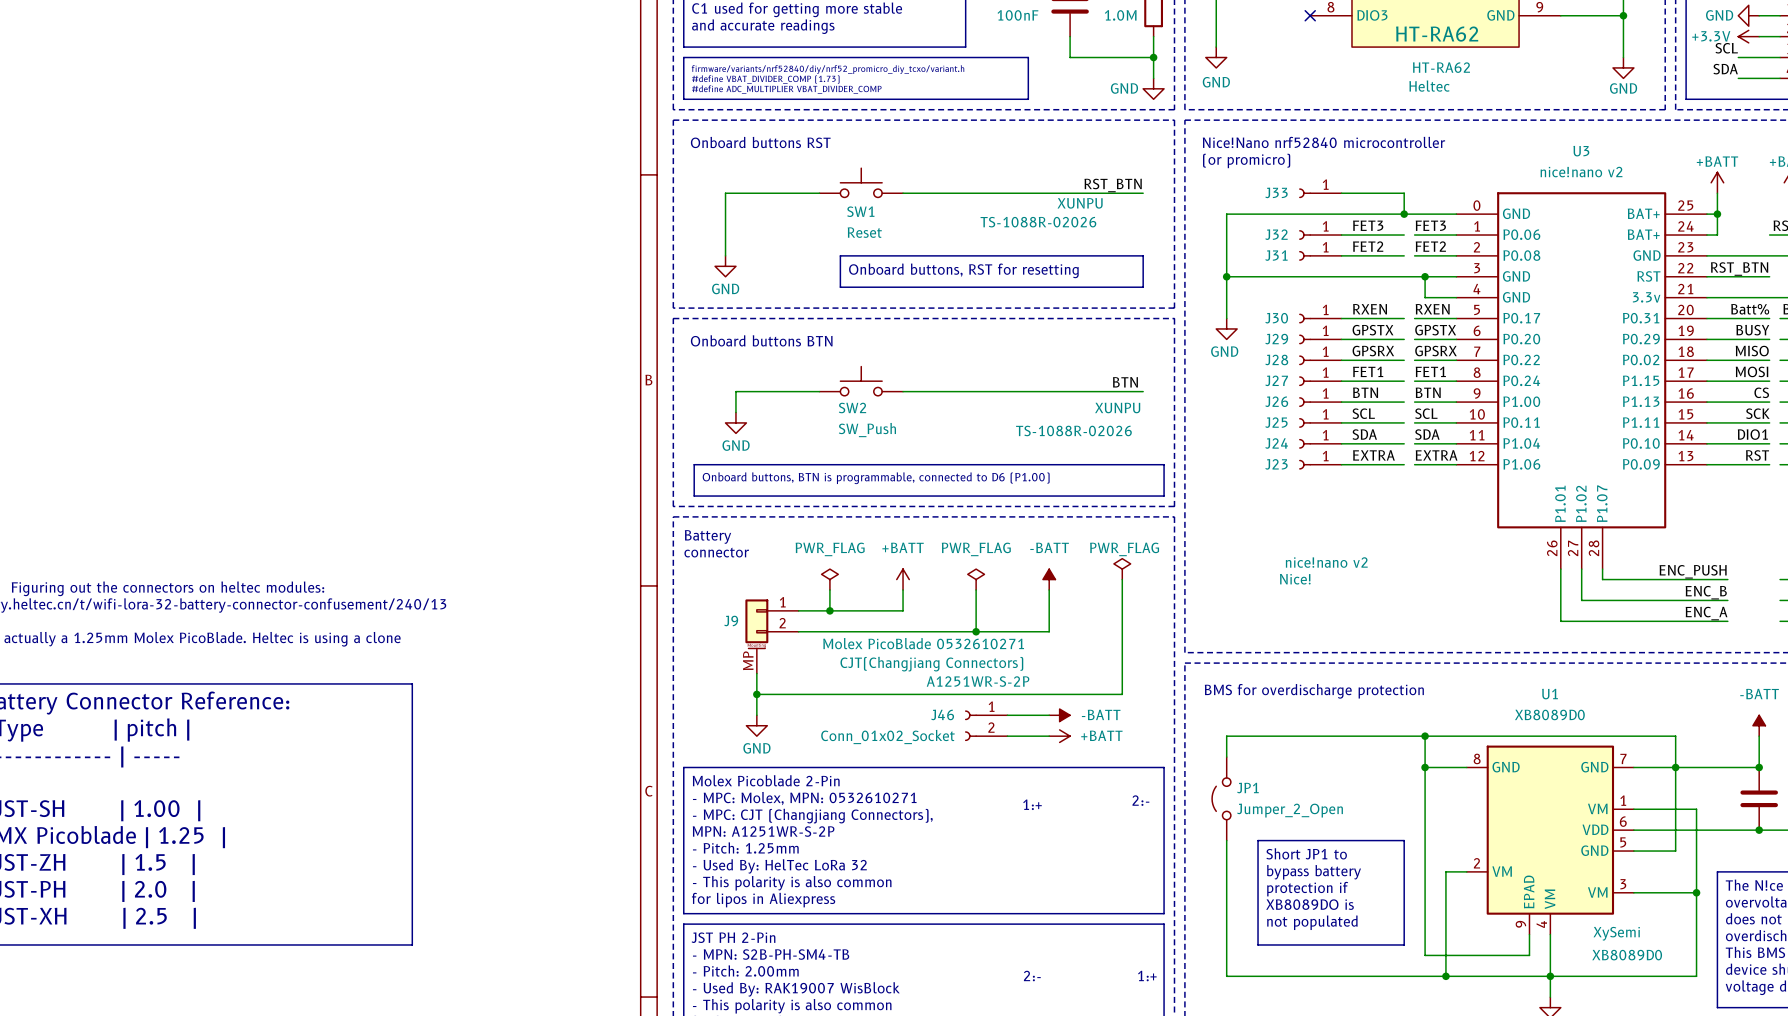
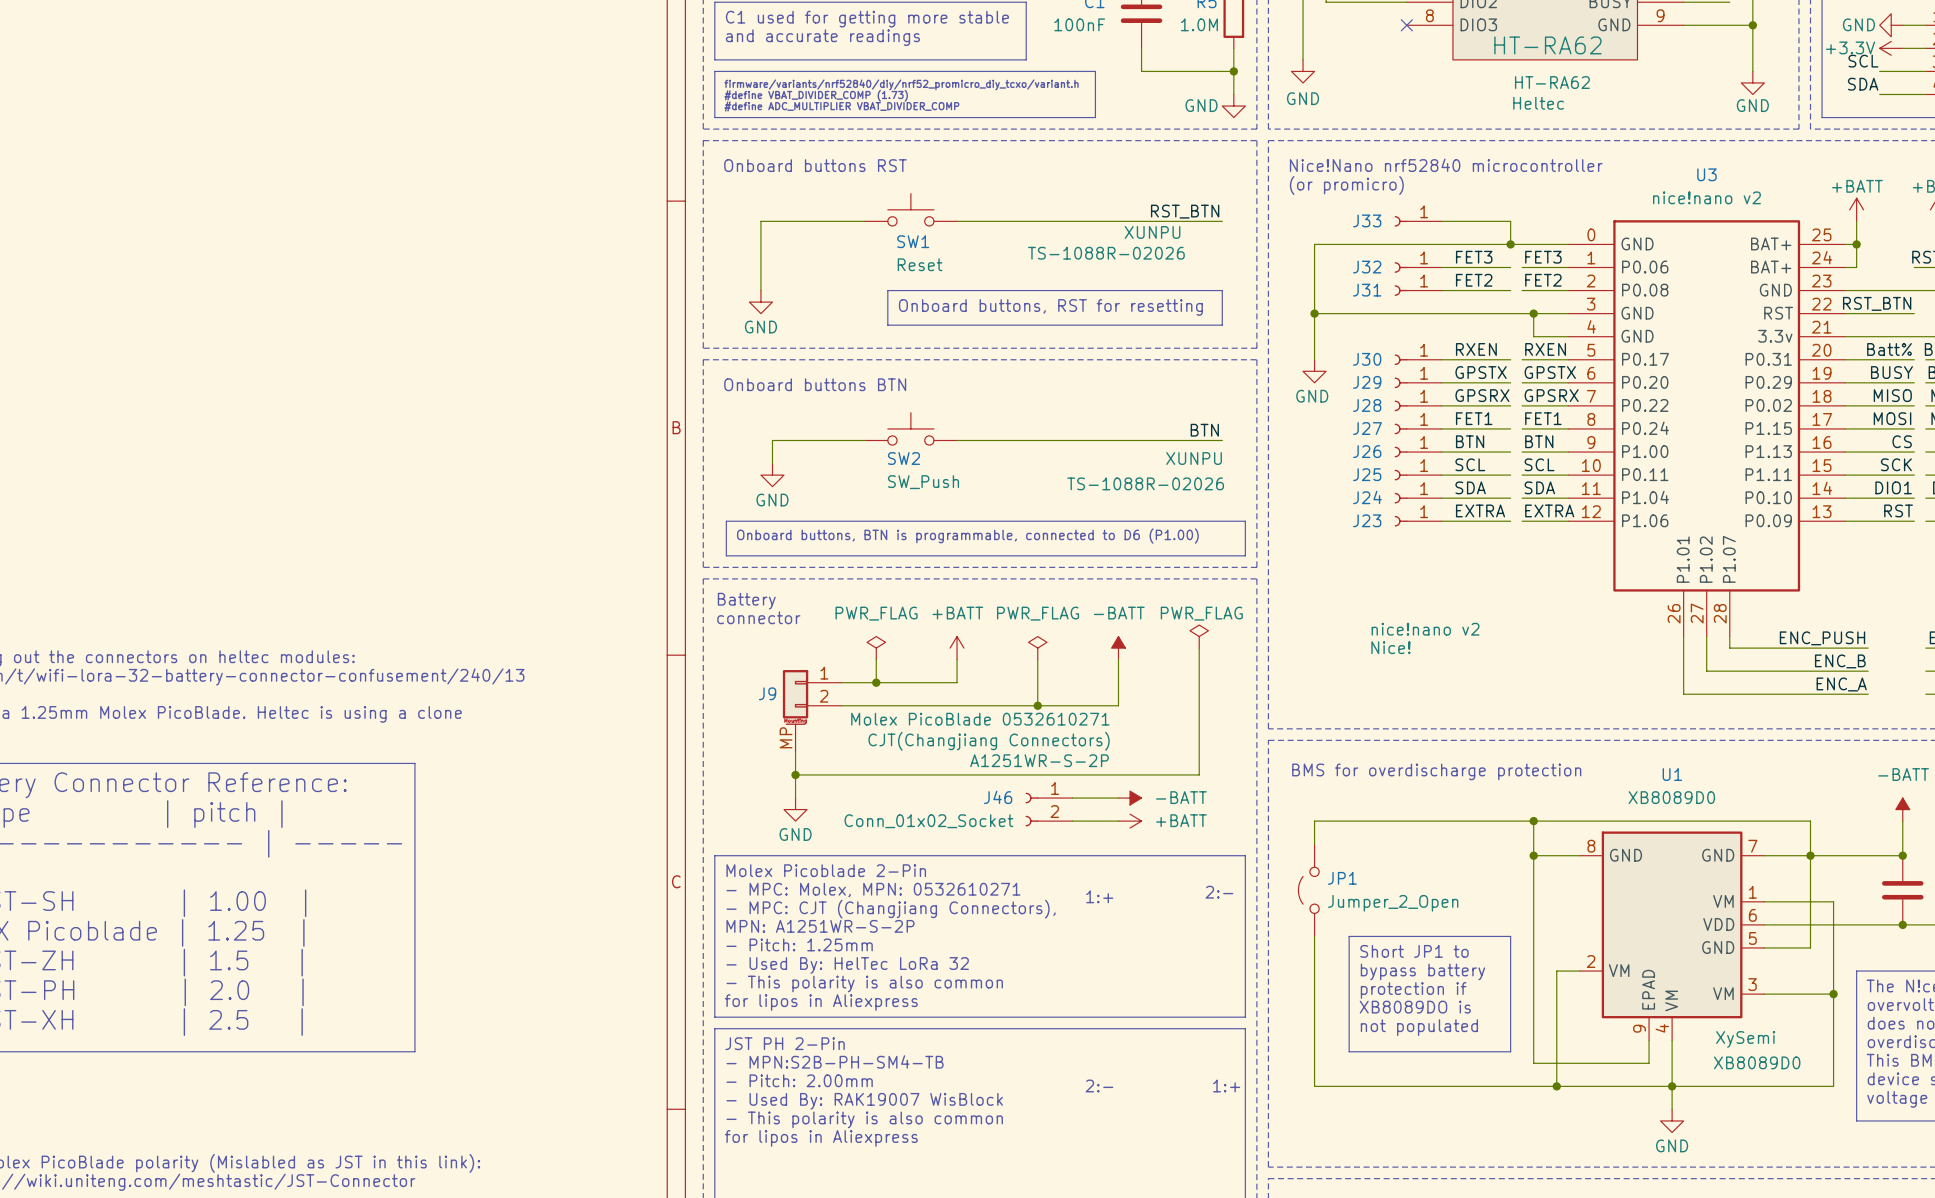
text: - MPN: S2B-PH-SM4-TB (771, 954) -> - MPN:S2B-PH-SM4-TB (835, 1061)

